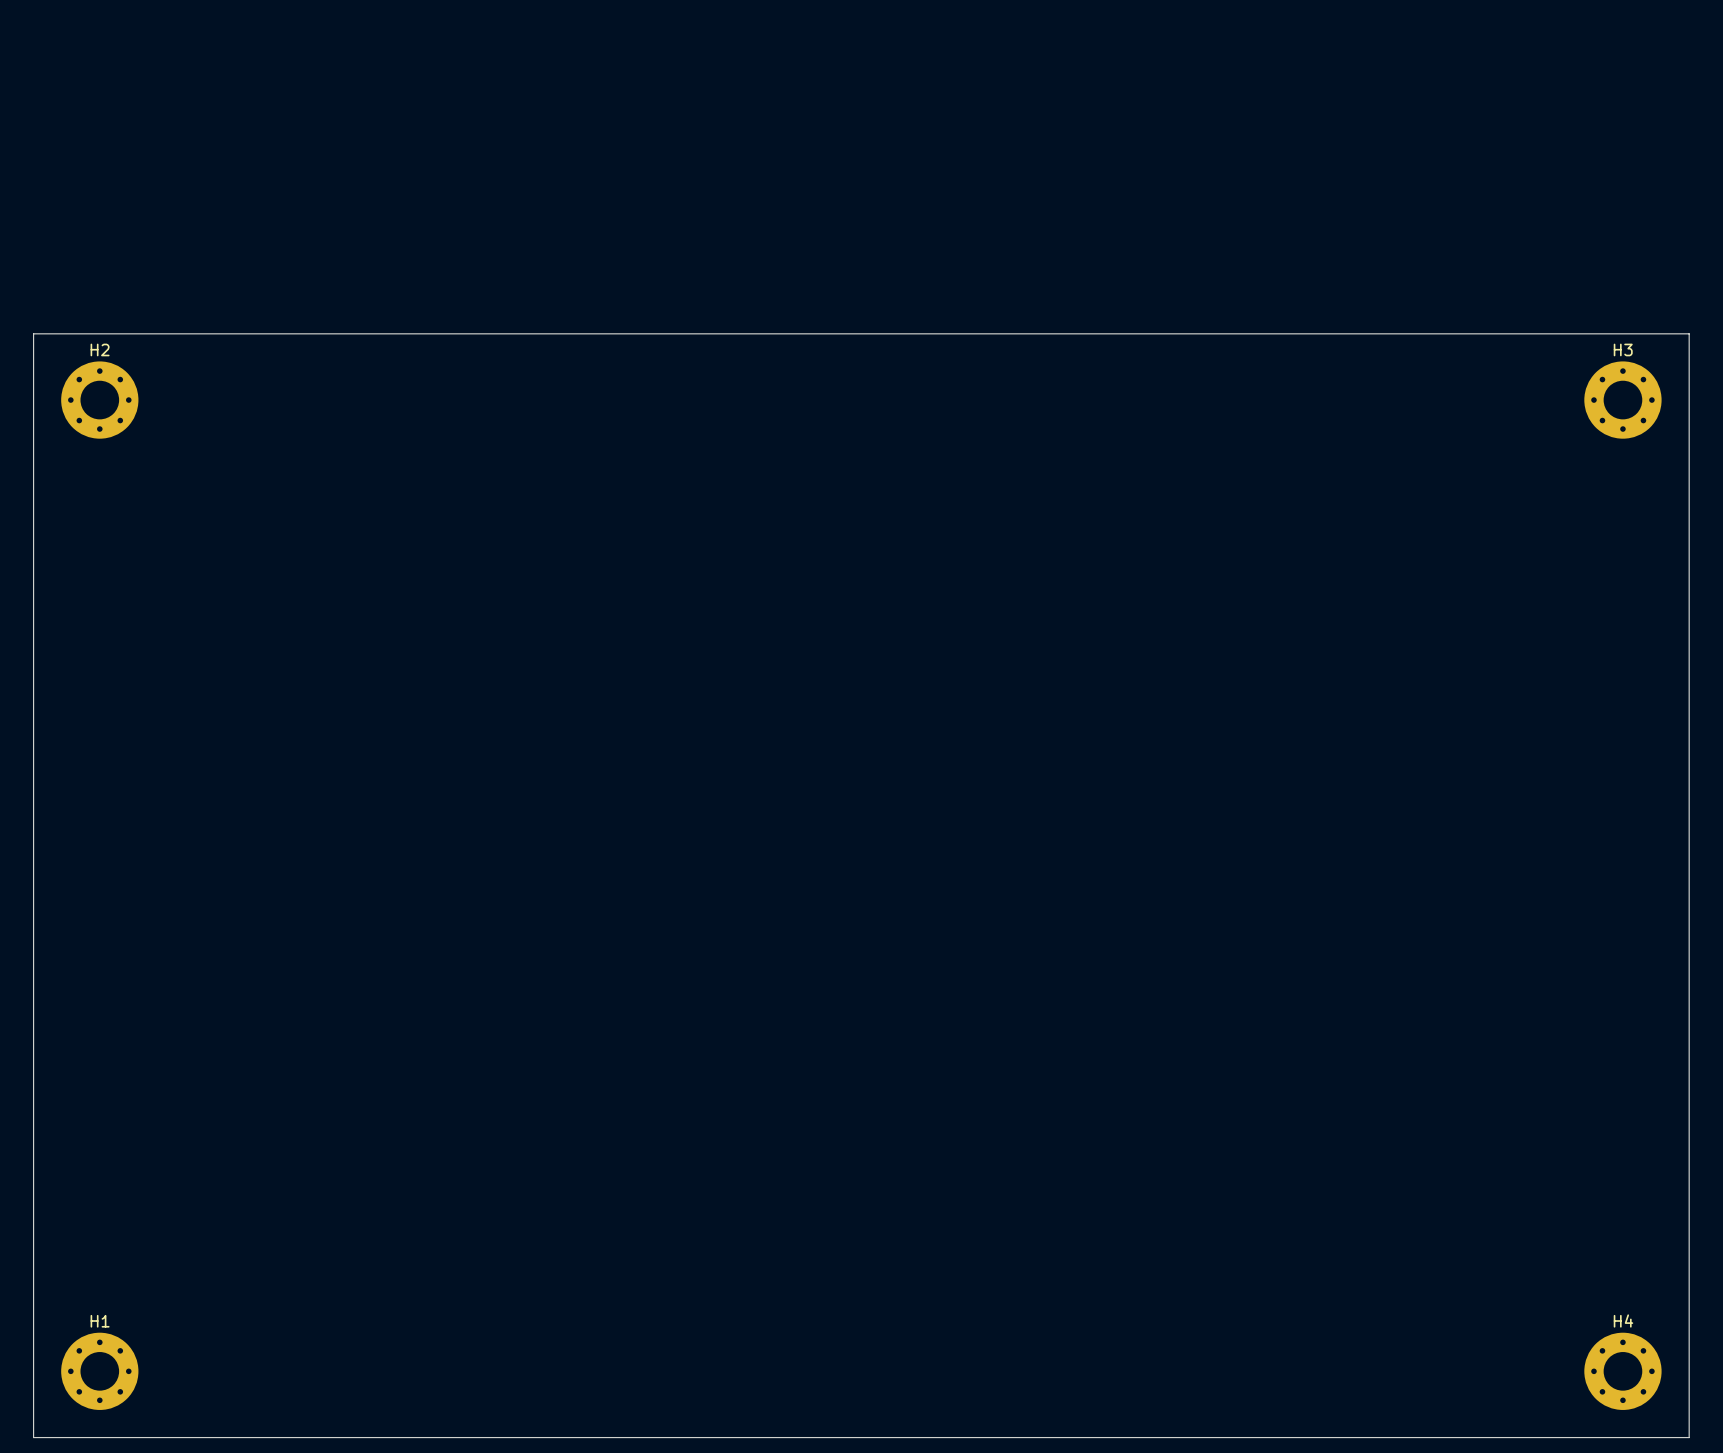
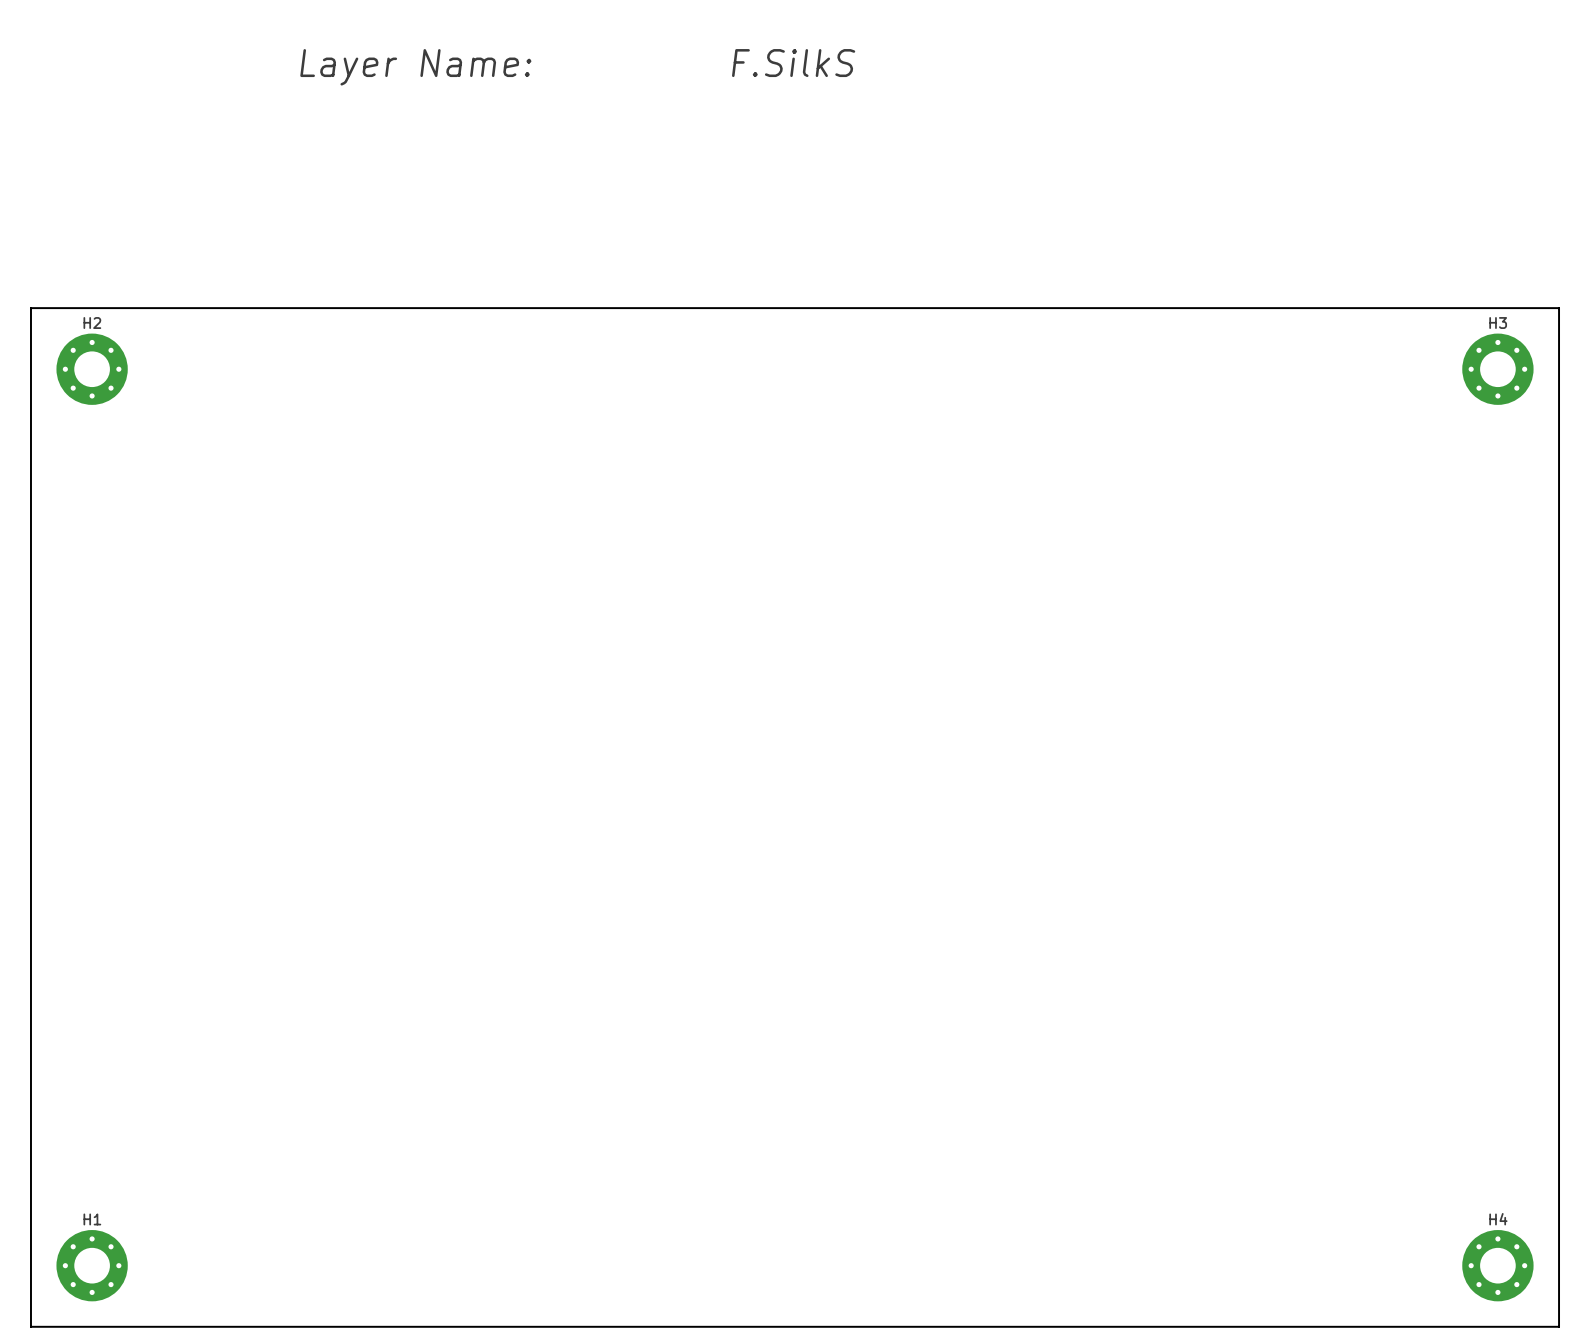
text: none -> Layer Name: F.SilkS (577, 67)

